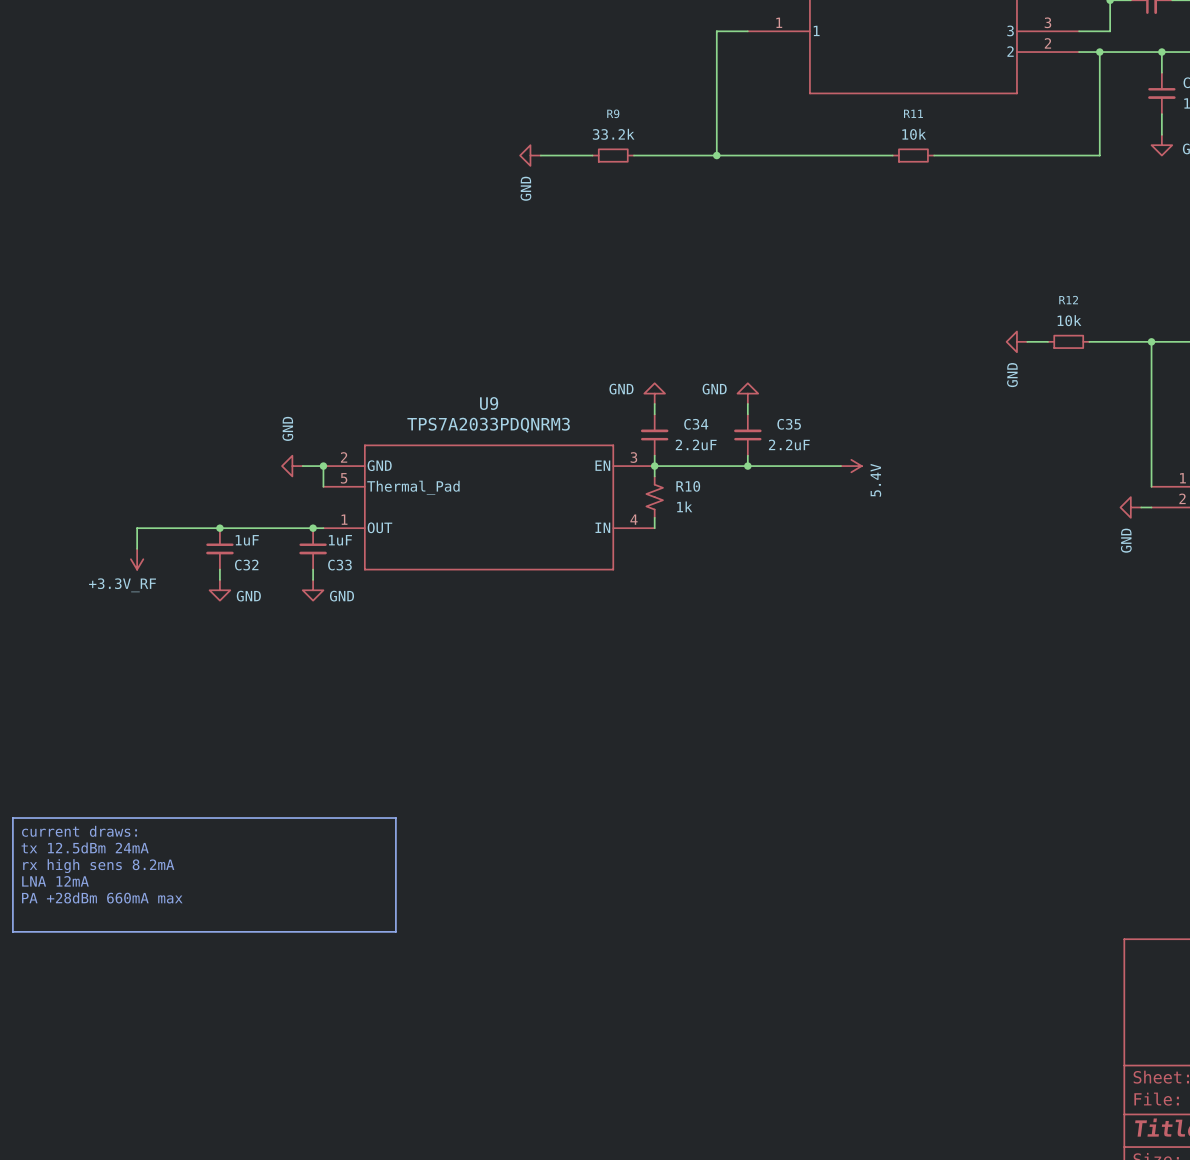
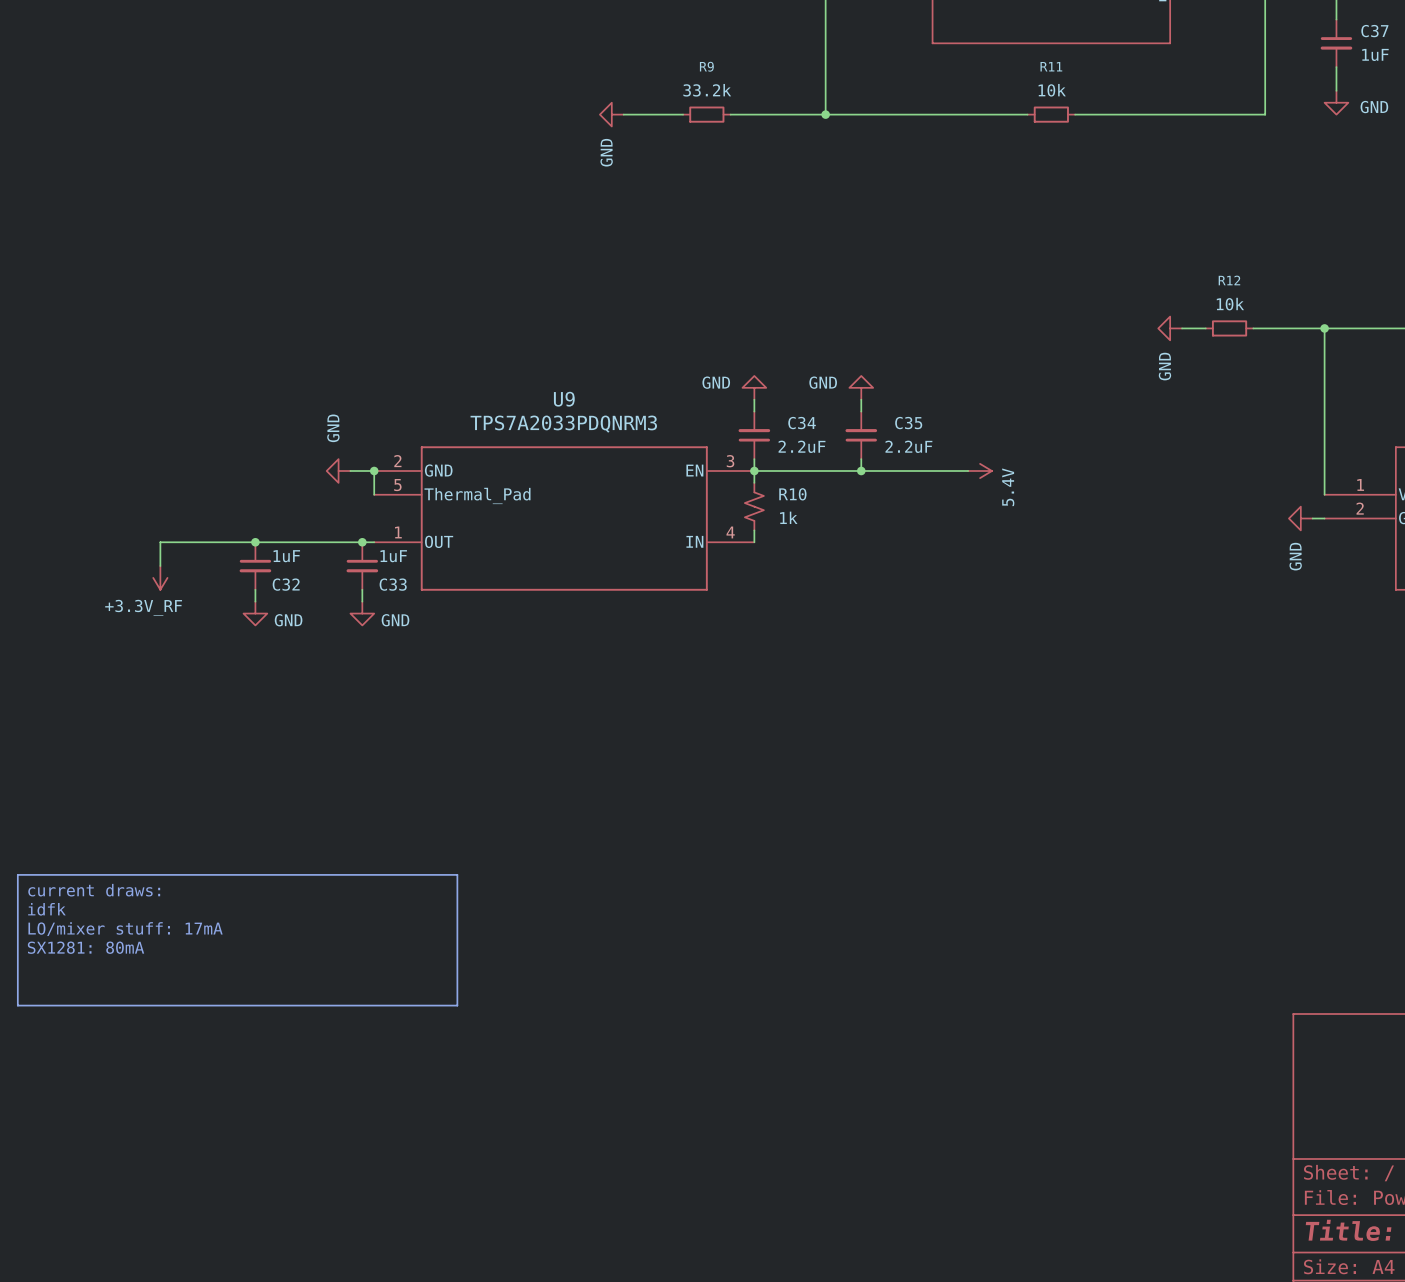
text: tx 12.5dBm 24mA (85, 847) -> idfk (46, 909)
text: rx high sens 8.2mA (98, 866) -> LO/mixer stuff: 17mA (125, 929)
text: LNA 12mA (55, 881) -> SX1281: 80mA (86, 947)
text: PA +28dBm 660mA max (102, 897) -> none

